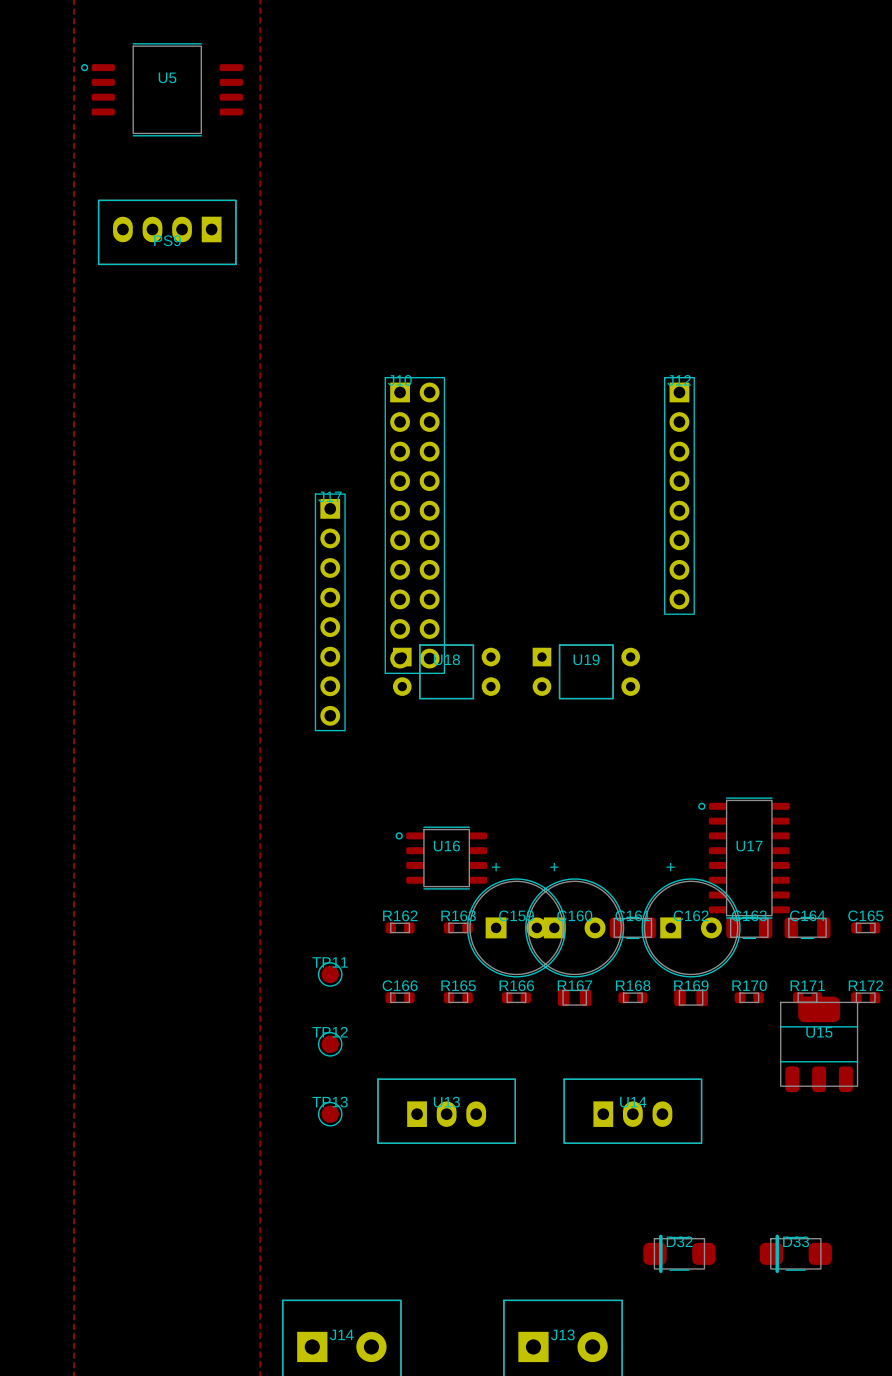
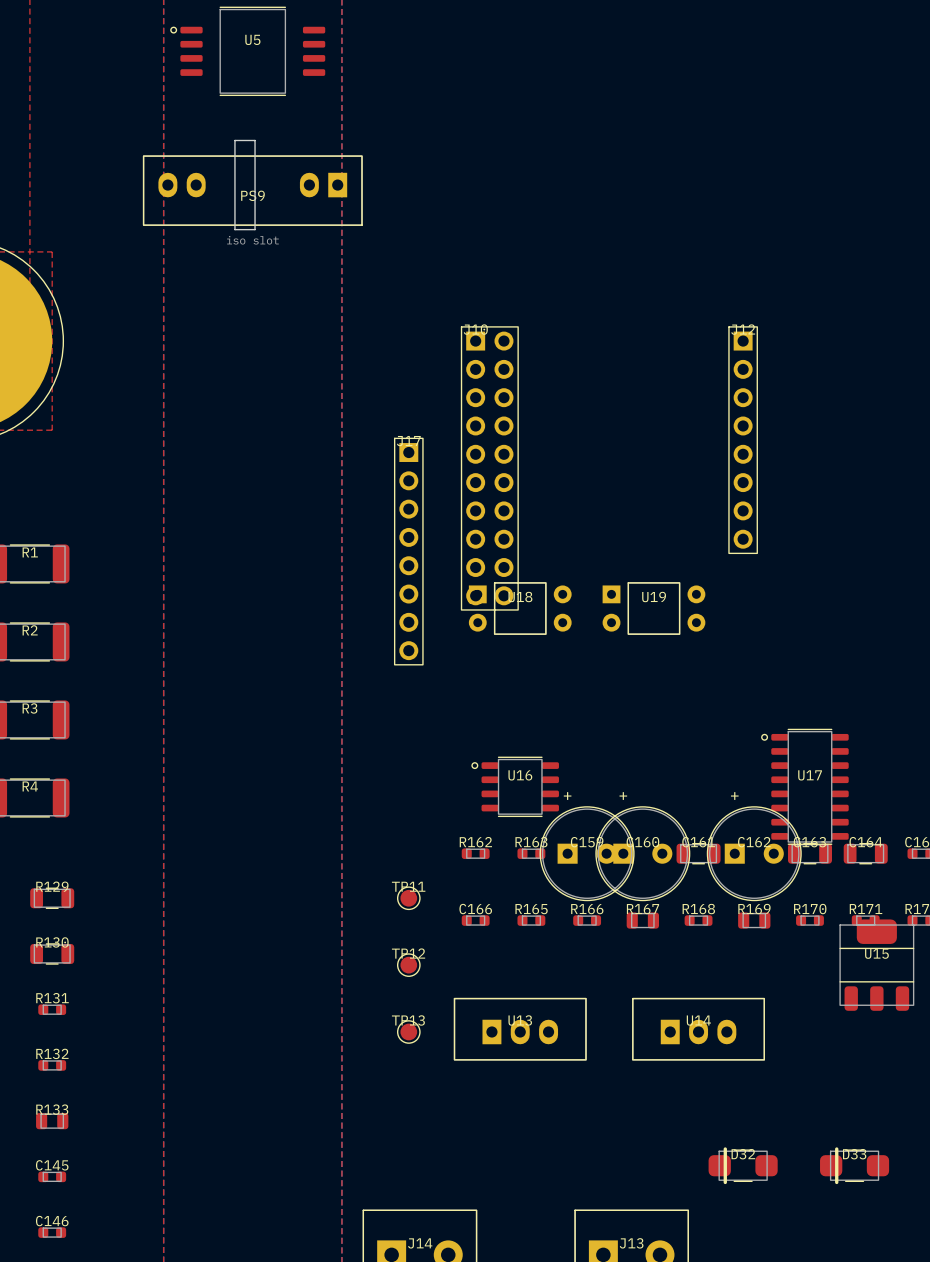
board edge: none -> (234, 140) (255, 140) (255, 229) (234, 229) (234, 140)
PS9 footprint: [98, 199, 237, 265] -> [143, 155, 363, 226]

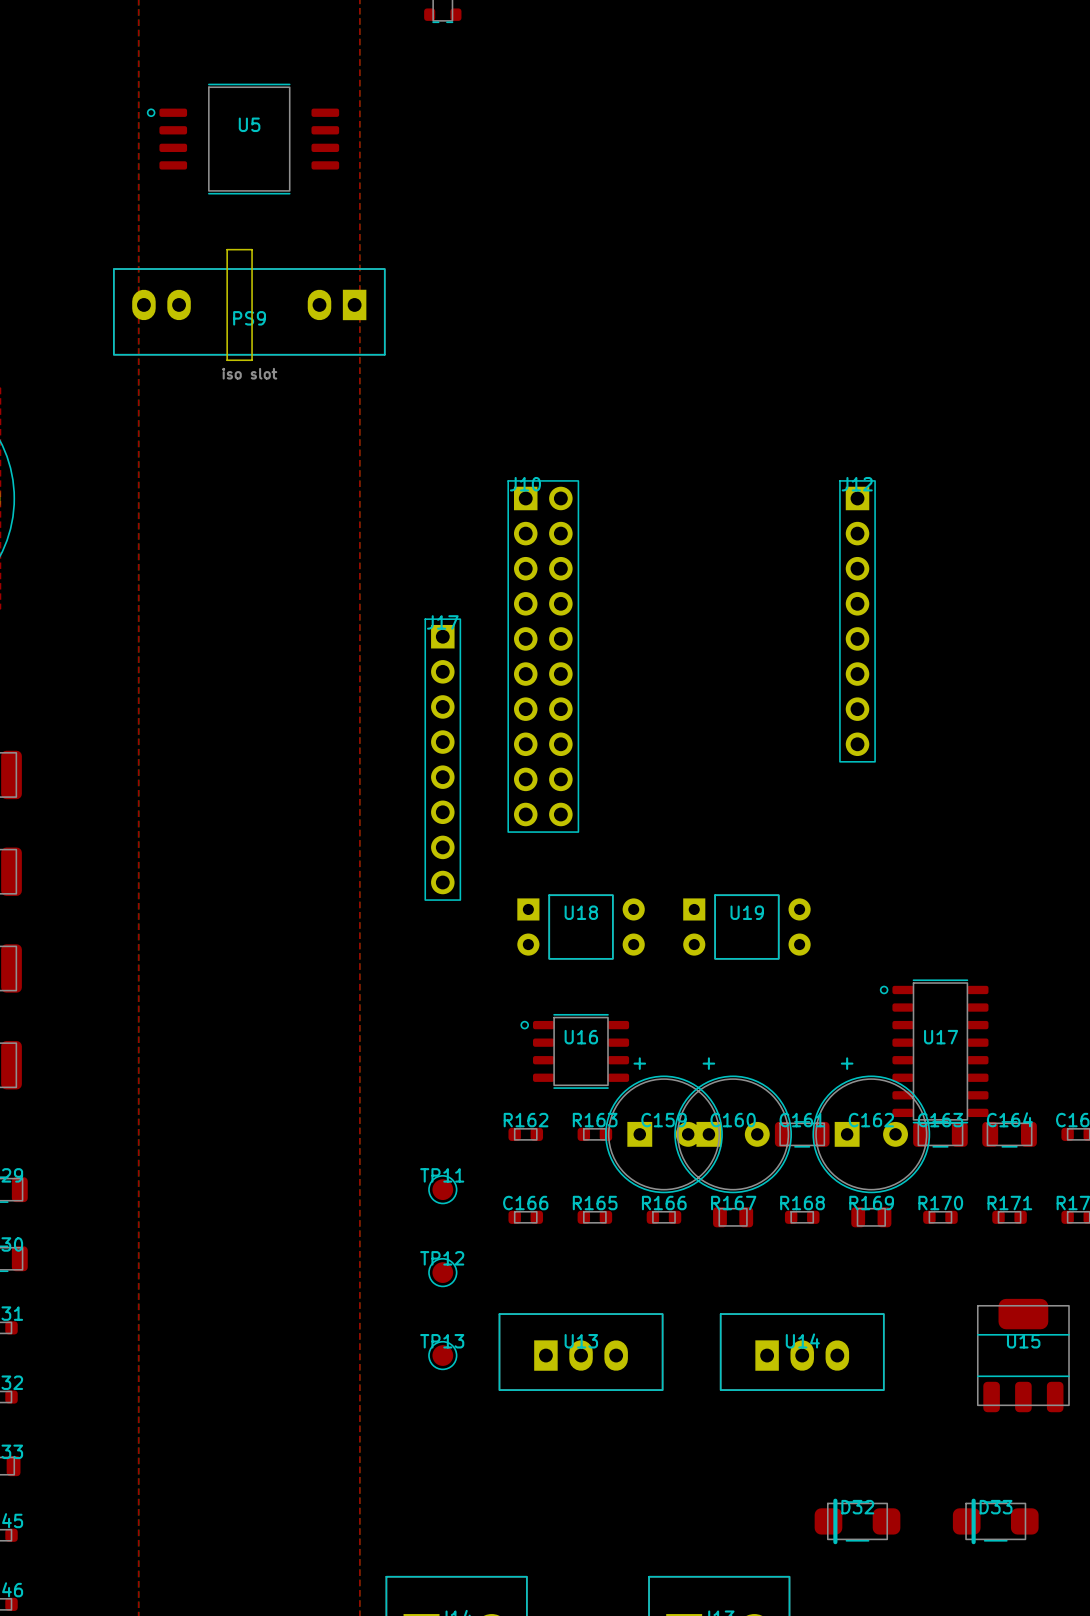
U18 position: (520, 608) -> (581, 927)
U19 position: (653, 608) -> (746, 927)
U15 position: (876, 965) -> (1023, 1355)

